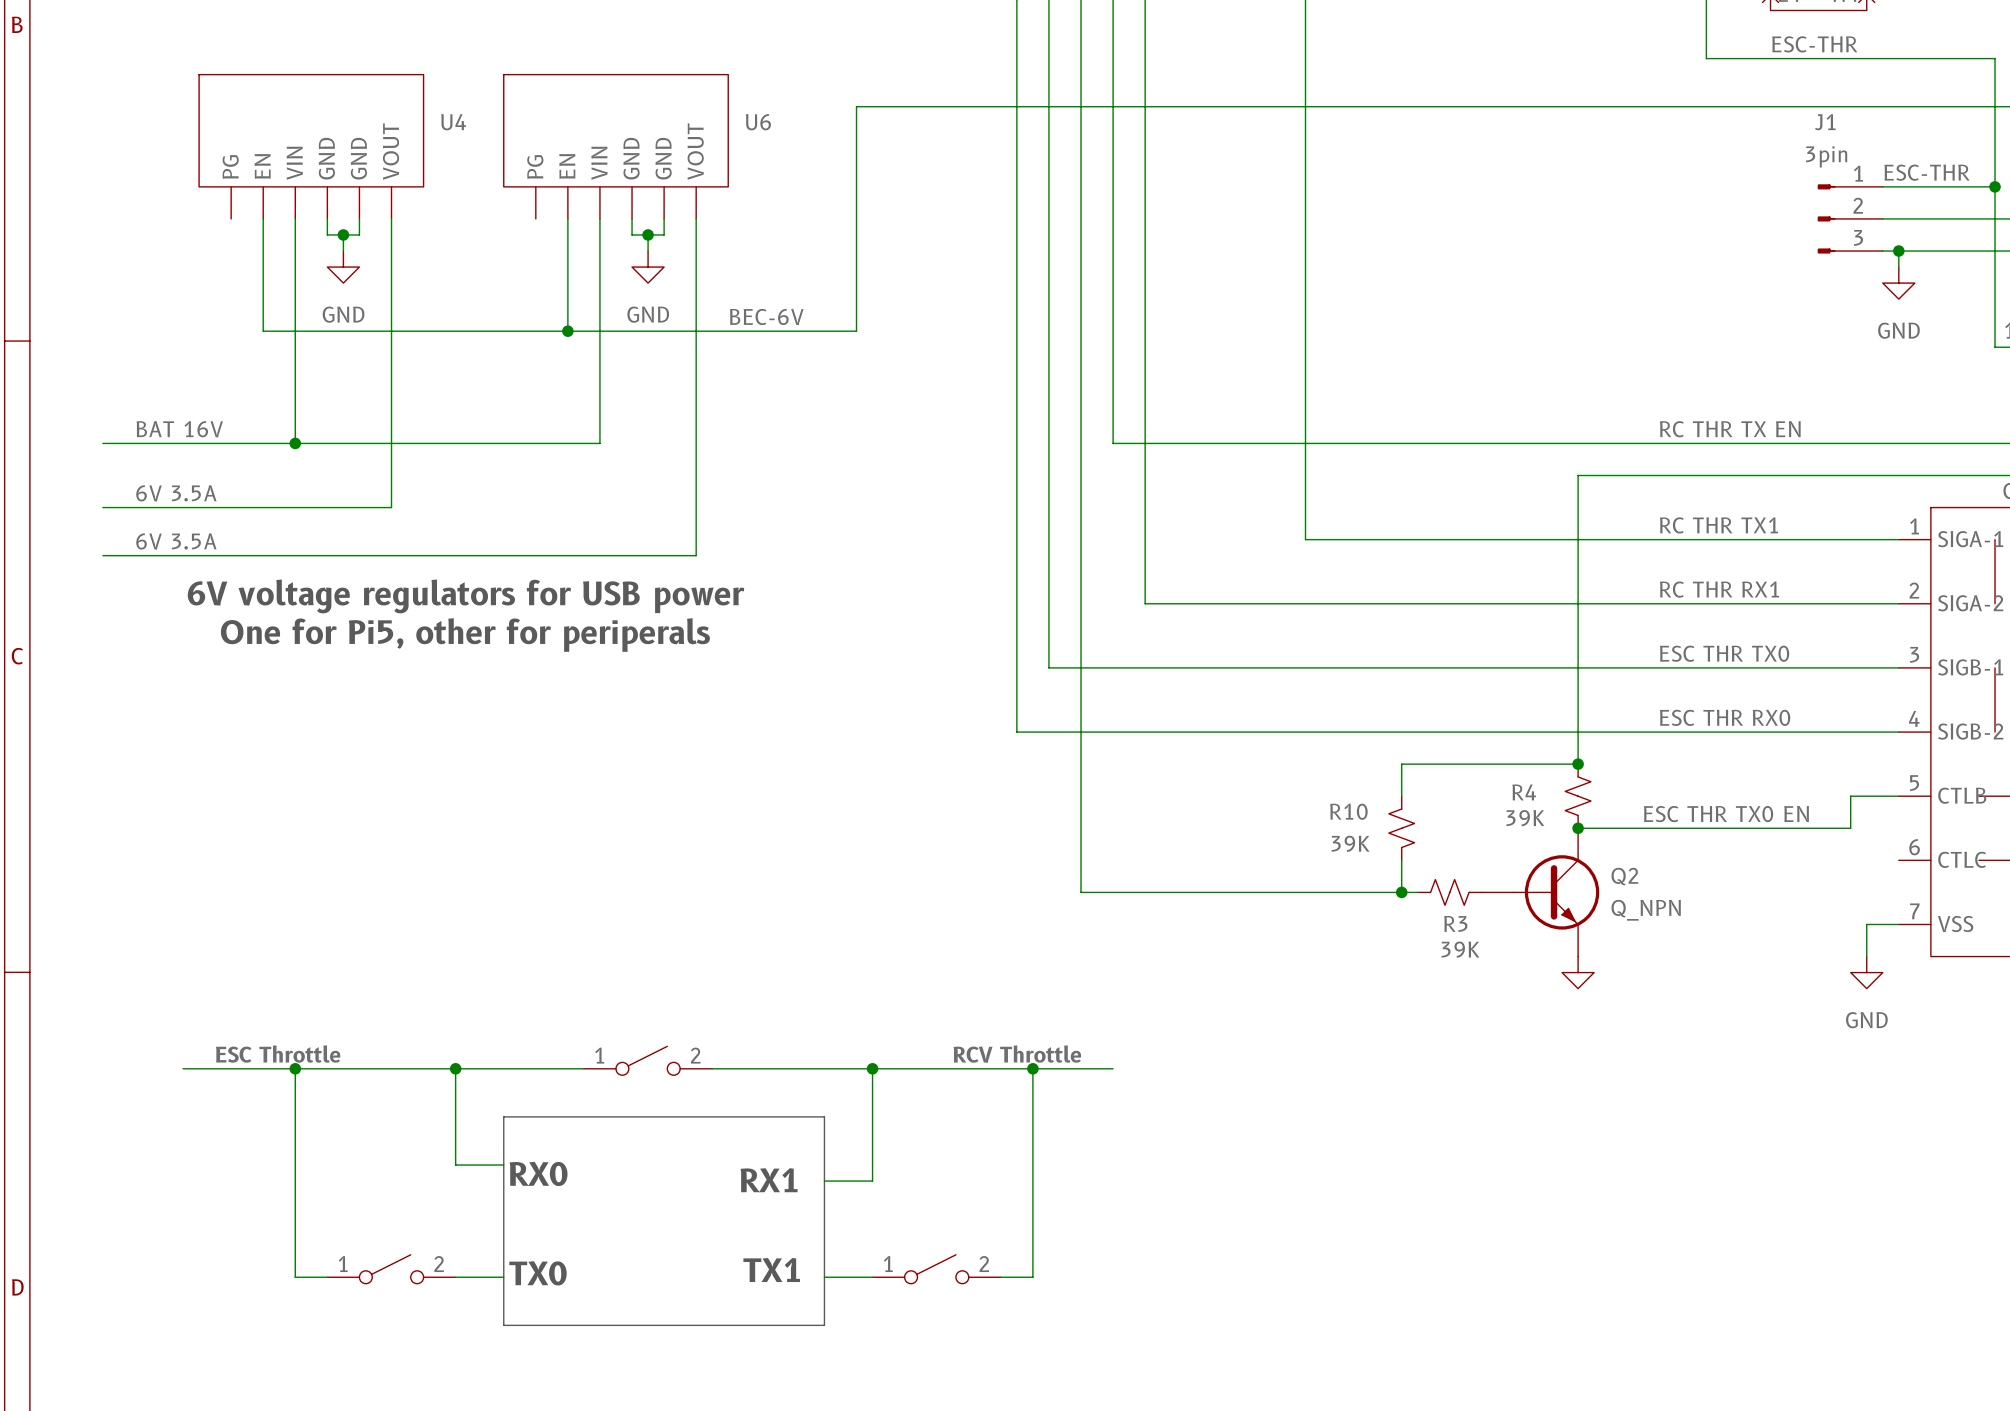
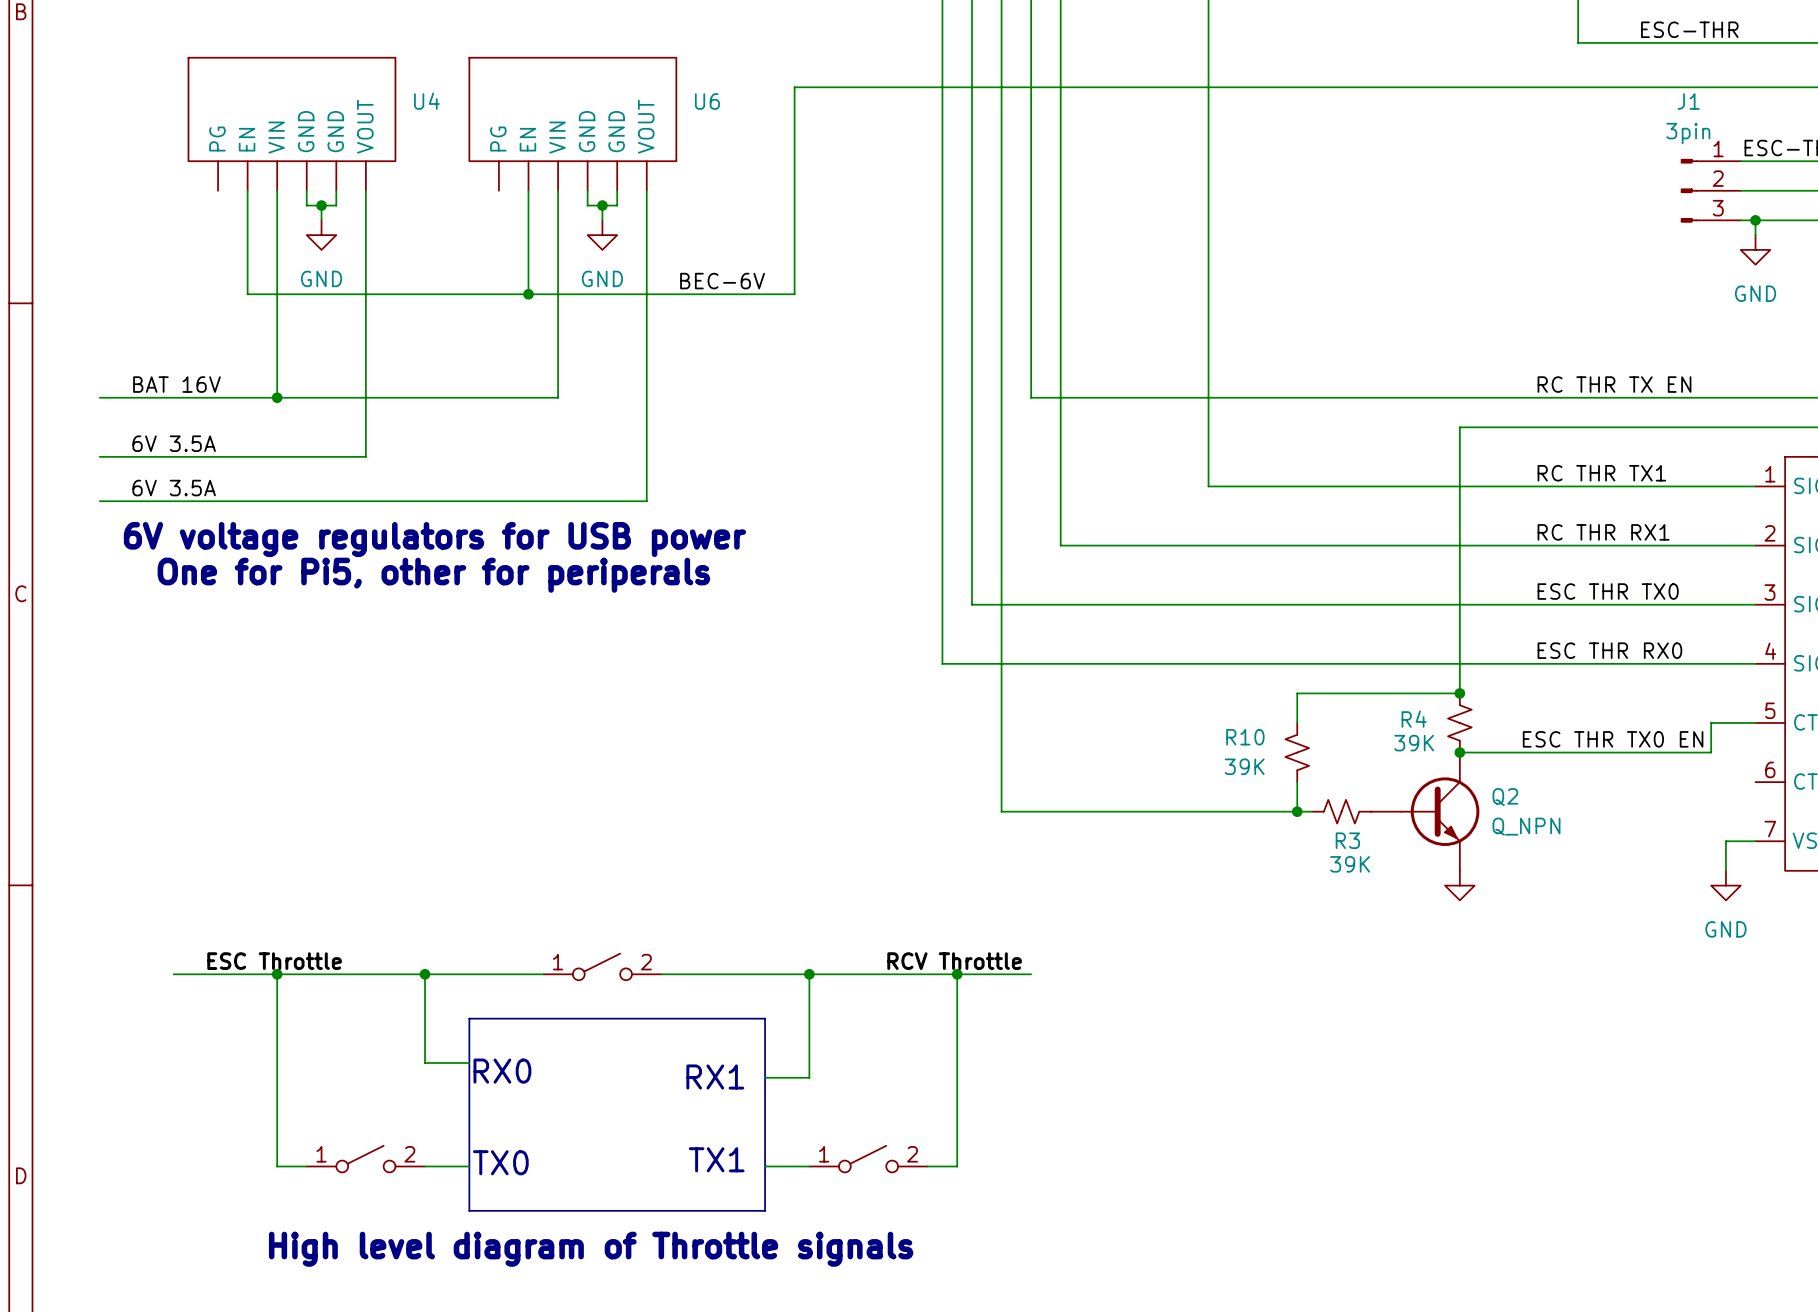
text: none -> High level diagram of Throttle signals (591, 1249)

